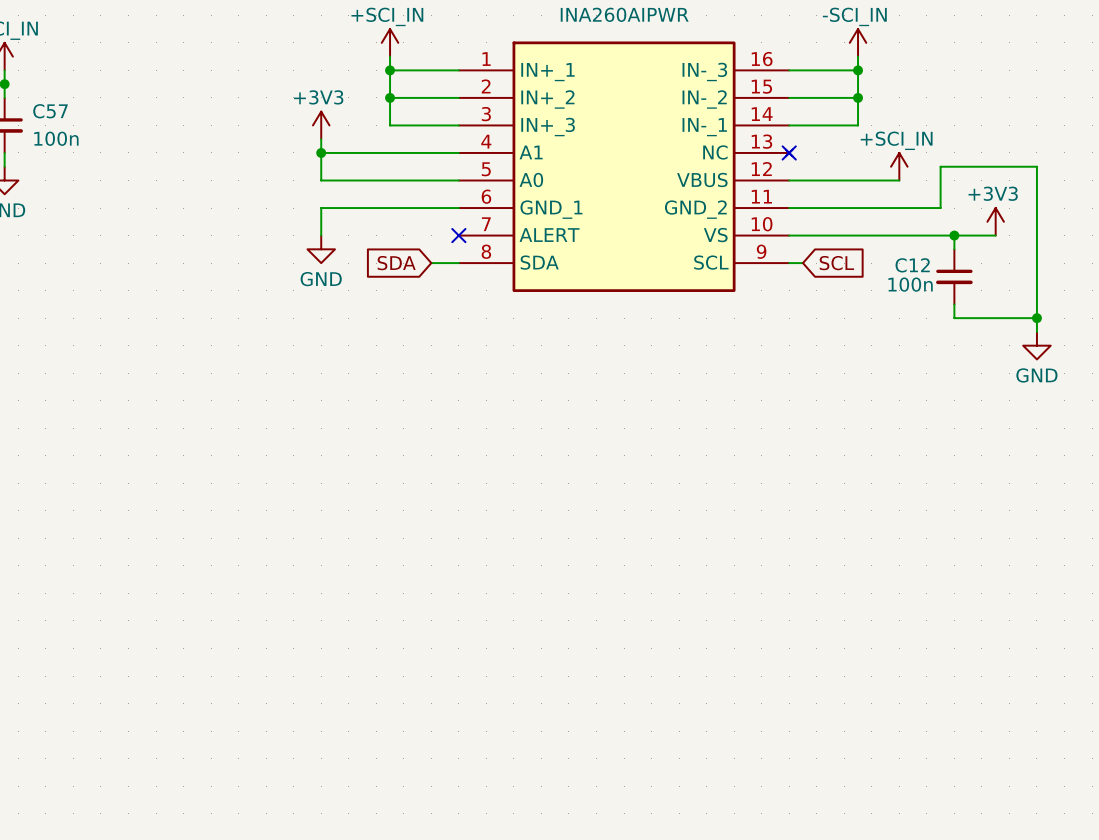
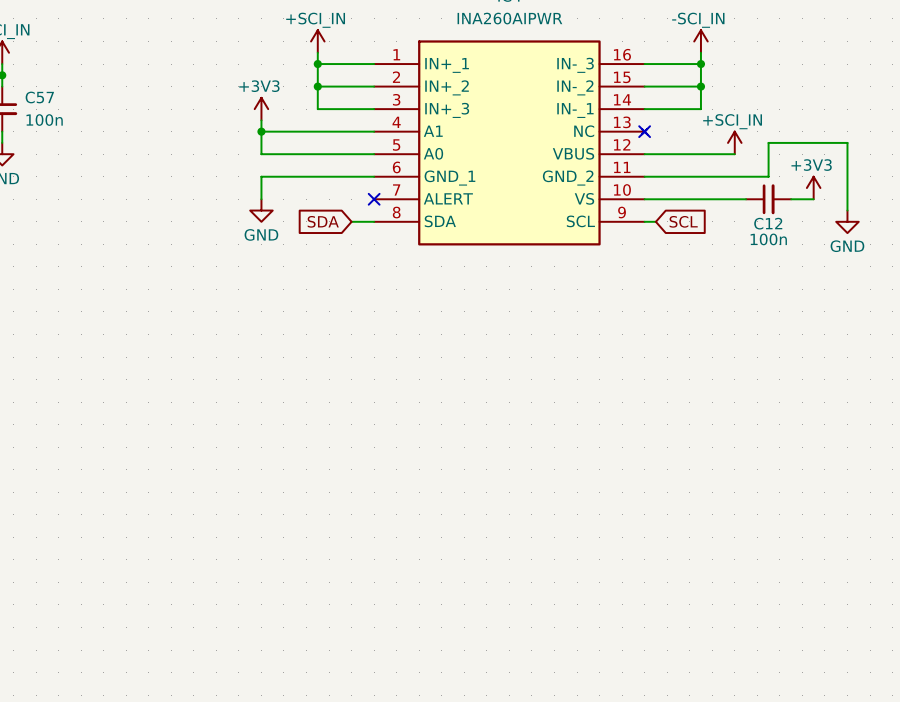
wire: (954, 235) (954, 249) -> none
junction: (954, 235) -> none
wire: (1036, 249) (1036, 331) -> none
C12 rotation: 0° (954, 276) -> 90° counterclockwise (768, 199)
C12 position: (954, 276) -> (768, 199)
wire: (954, 304) (954, 318) (1036, 318) -> none
junction: (1036, 318) -> none
power symbol position: GND (1036, 345) -> GND (847, 221)

